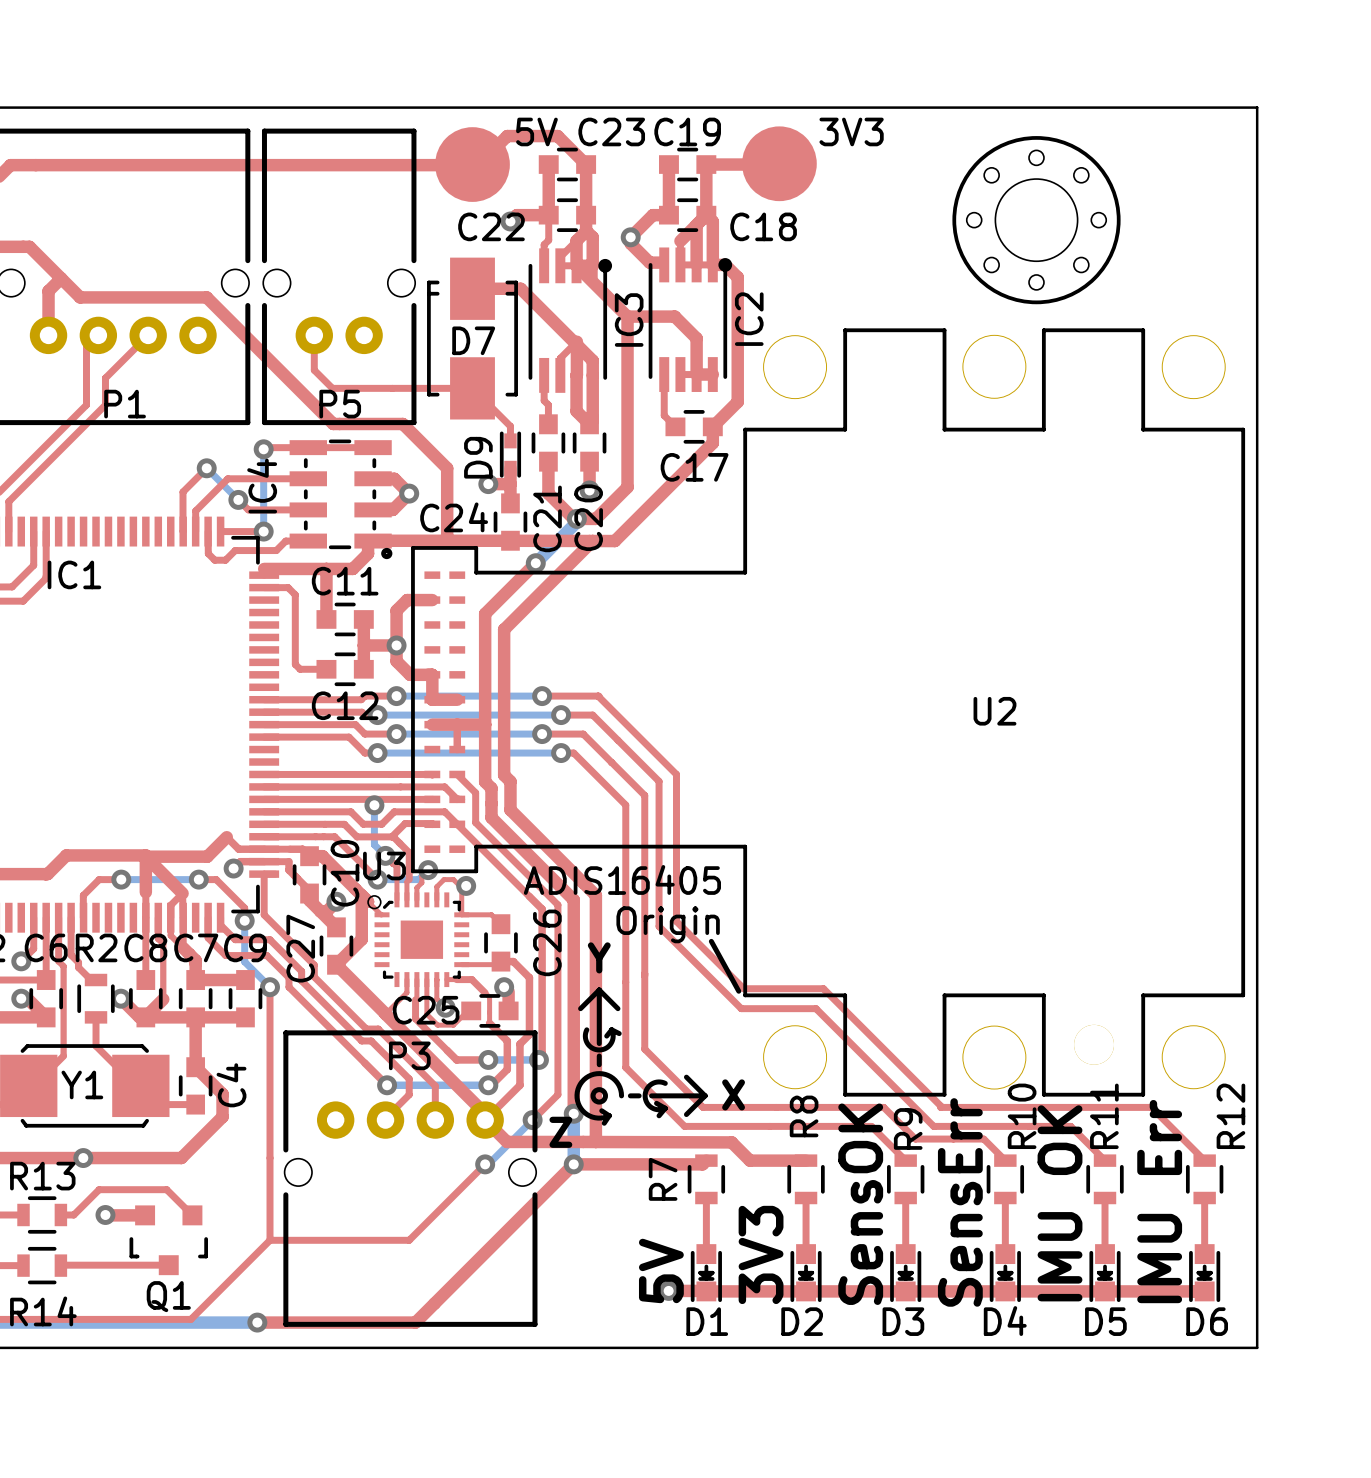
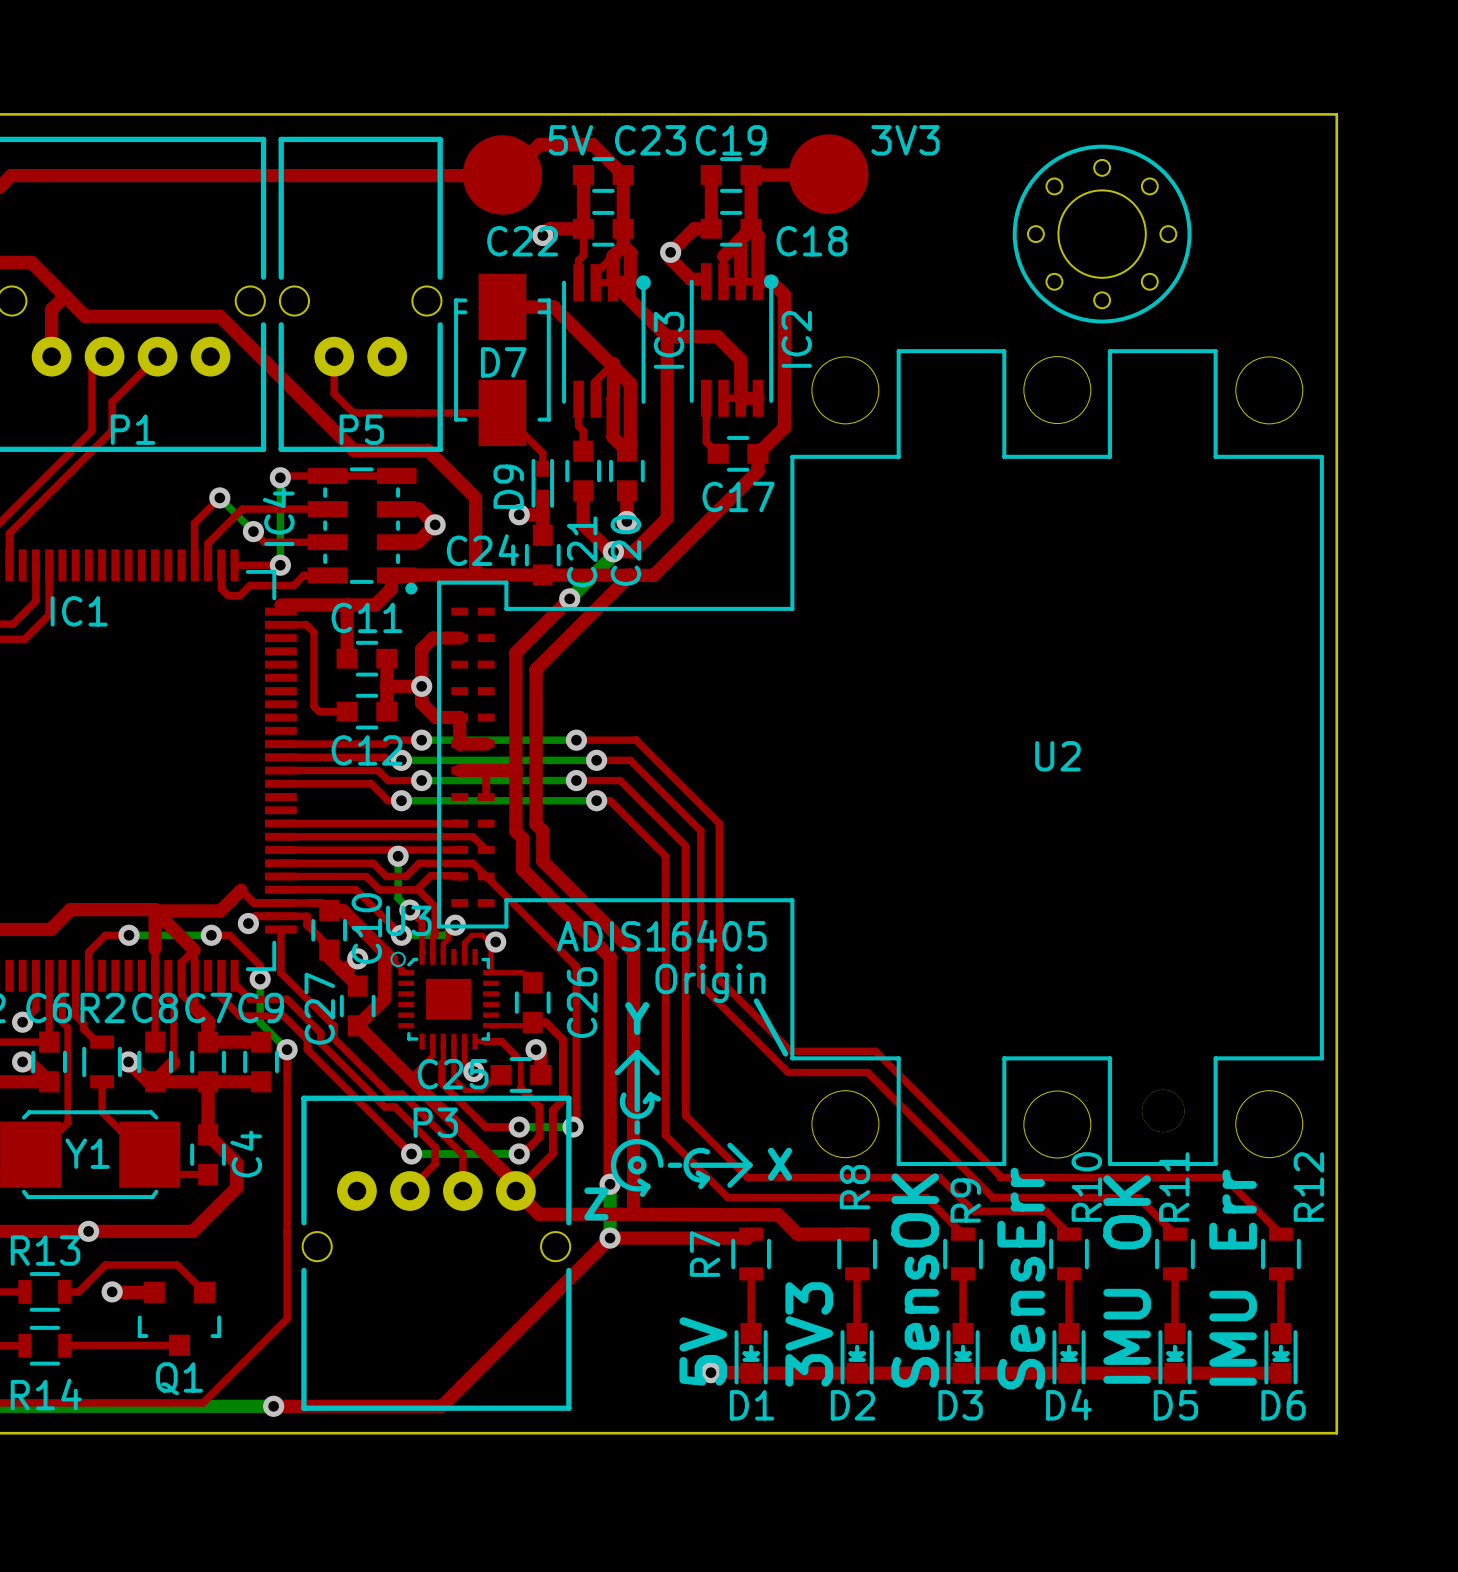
top track: (457, 774) (475, 792) (475, 822) (557, 904) (557, 1094) (532, 1120) -> none
bottom track: (532, 1120) (488, 1164) (485, 1164) -> none
via: (532, 1120) -> none
top track: (485, 1164) (409, 1240) (270, 1240) -> none
via: (485, 1164) -> none

